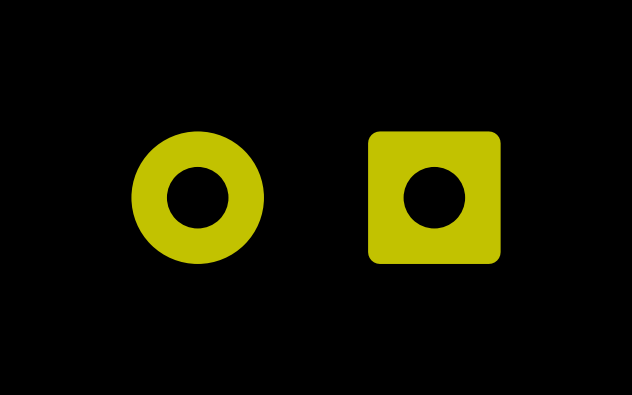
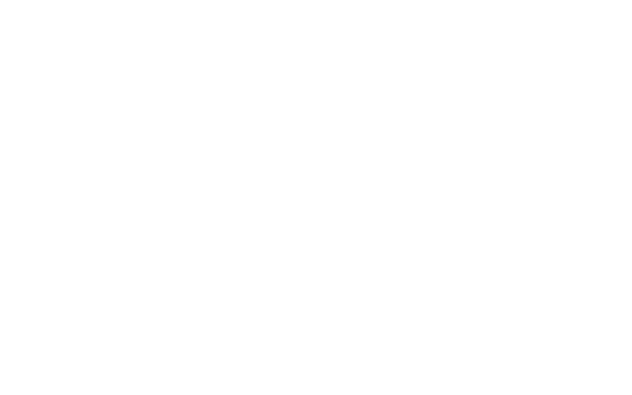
part: (316, 197) -> none

